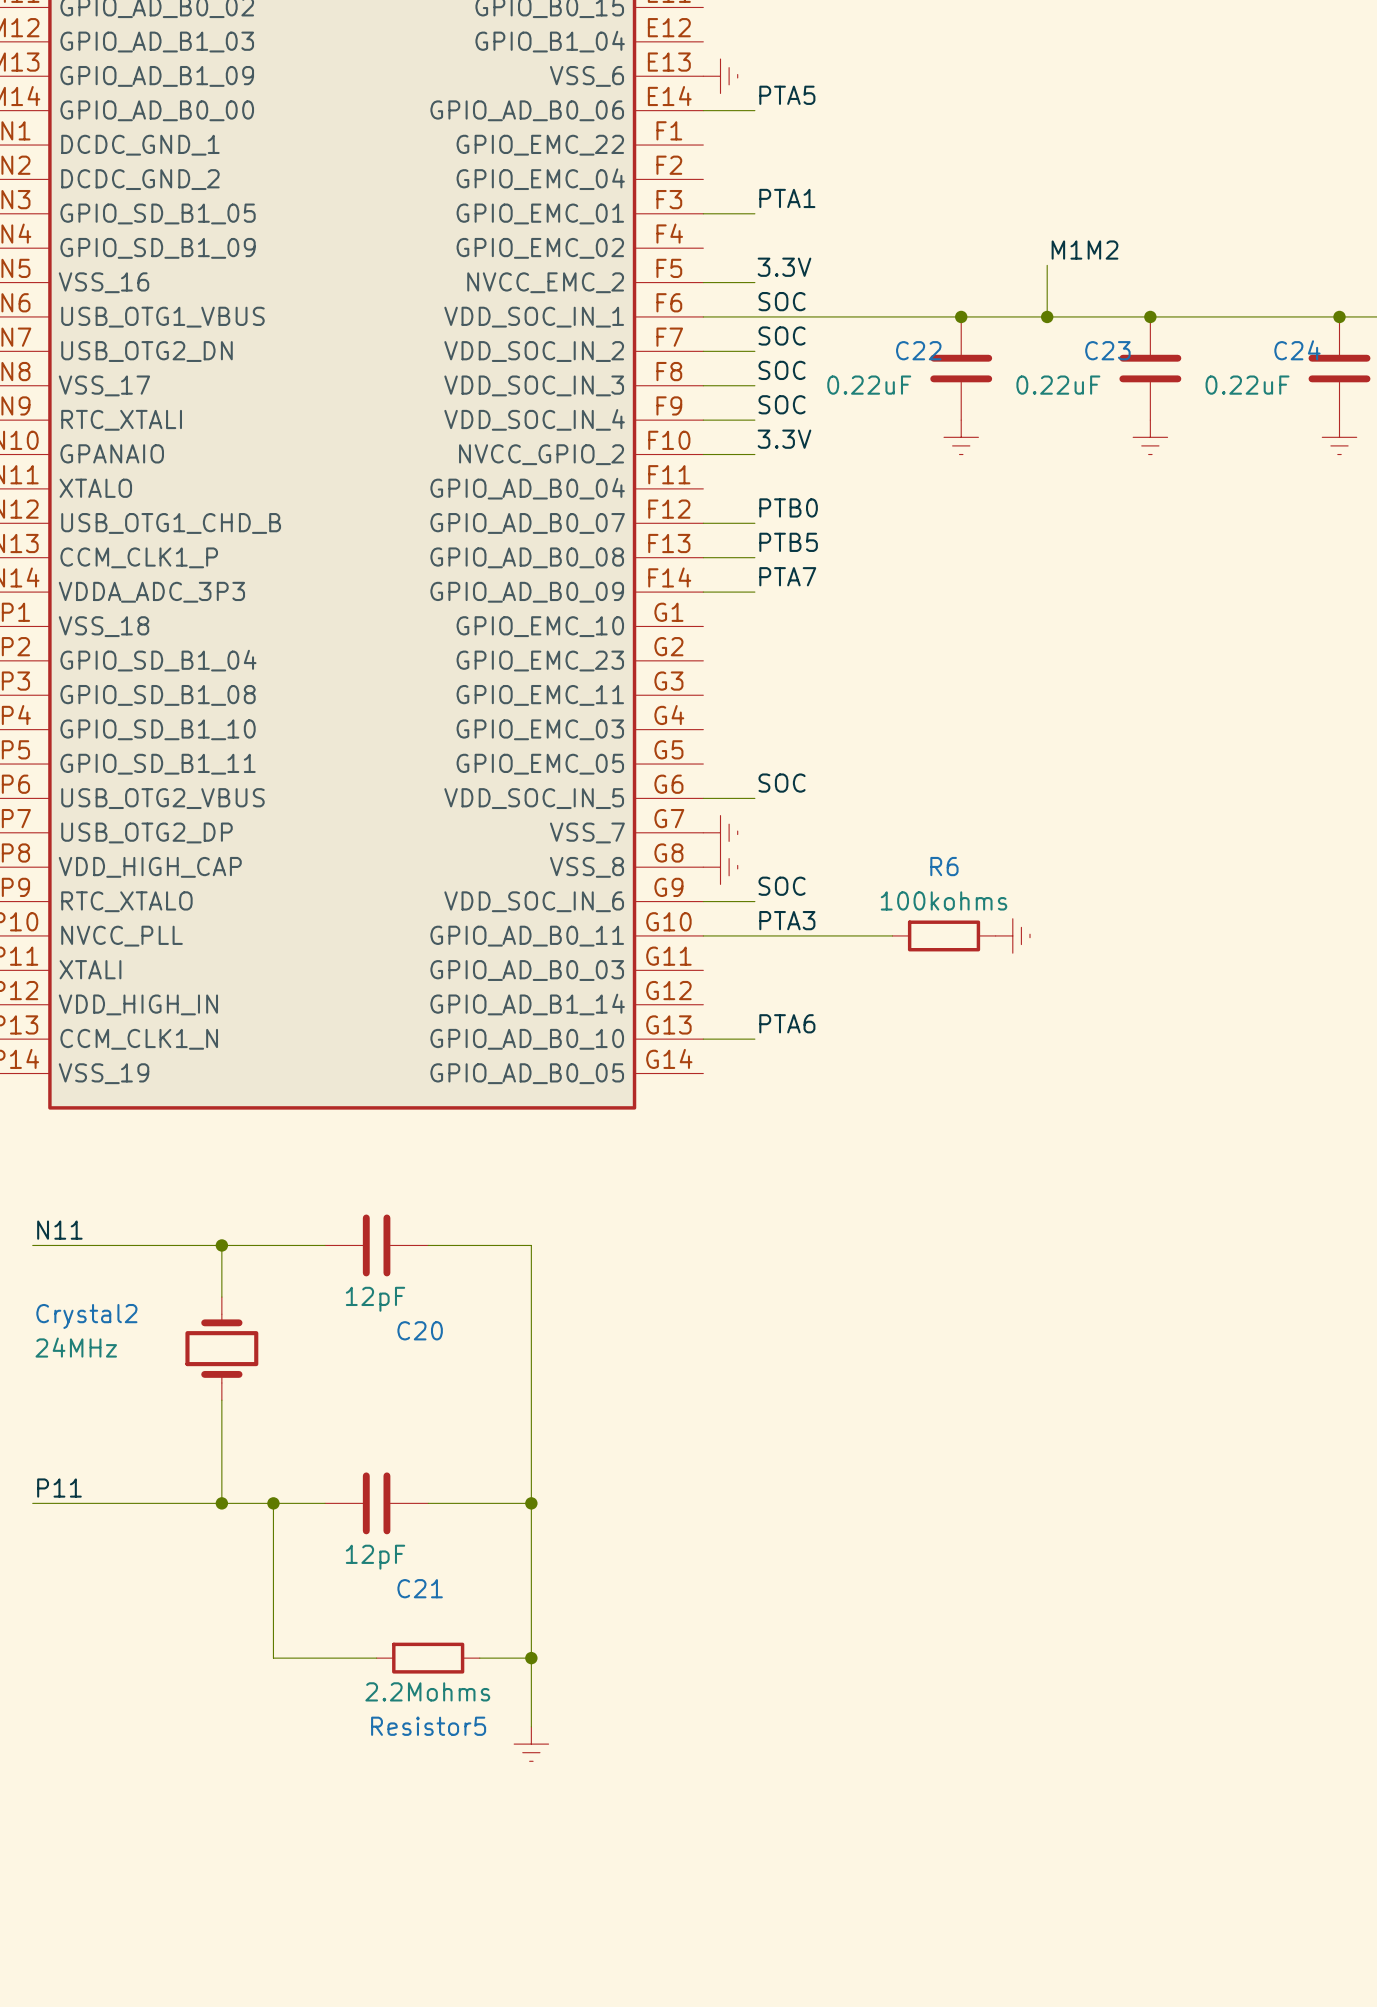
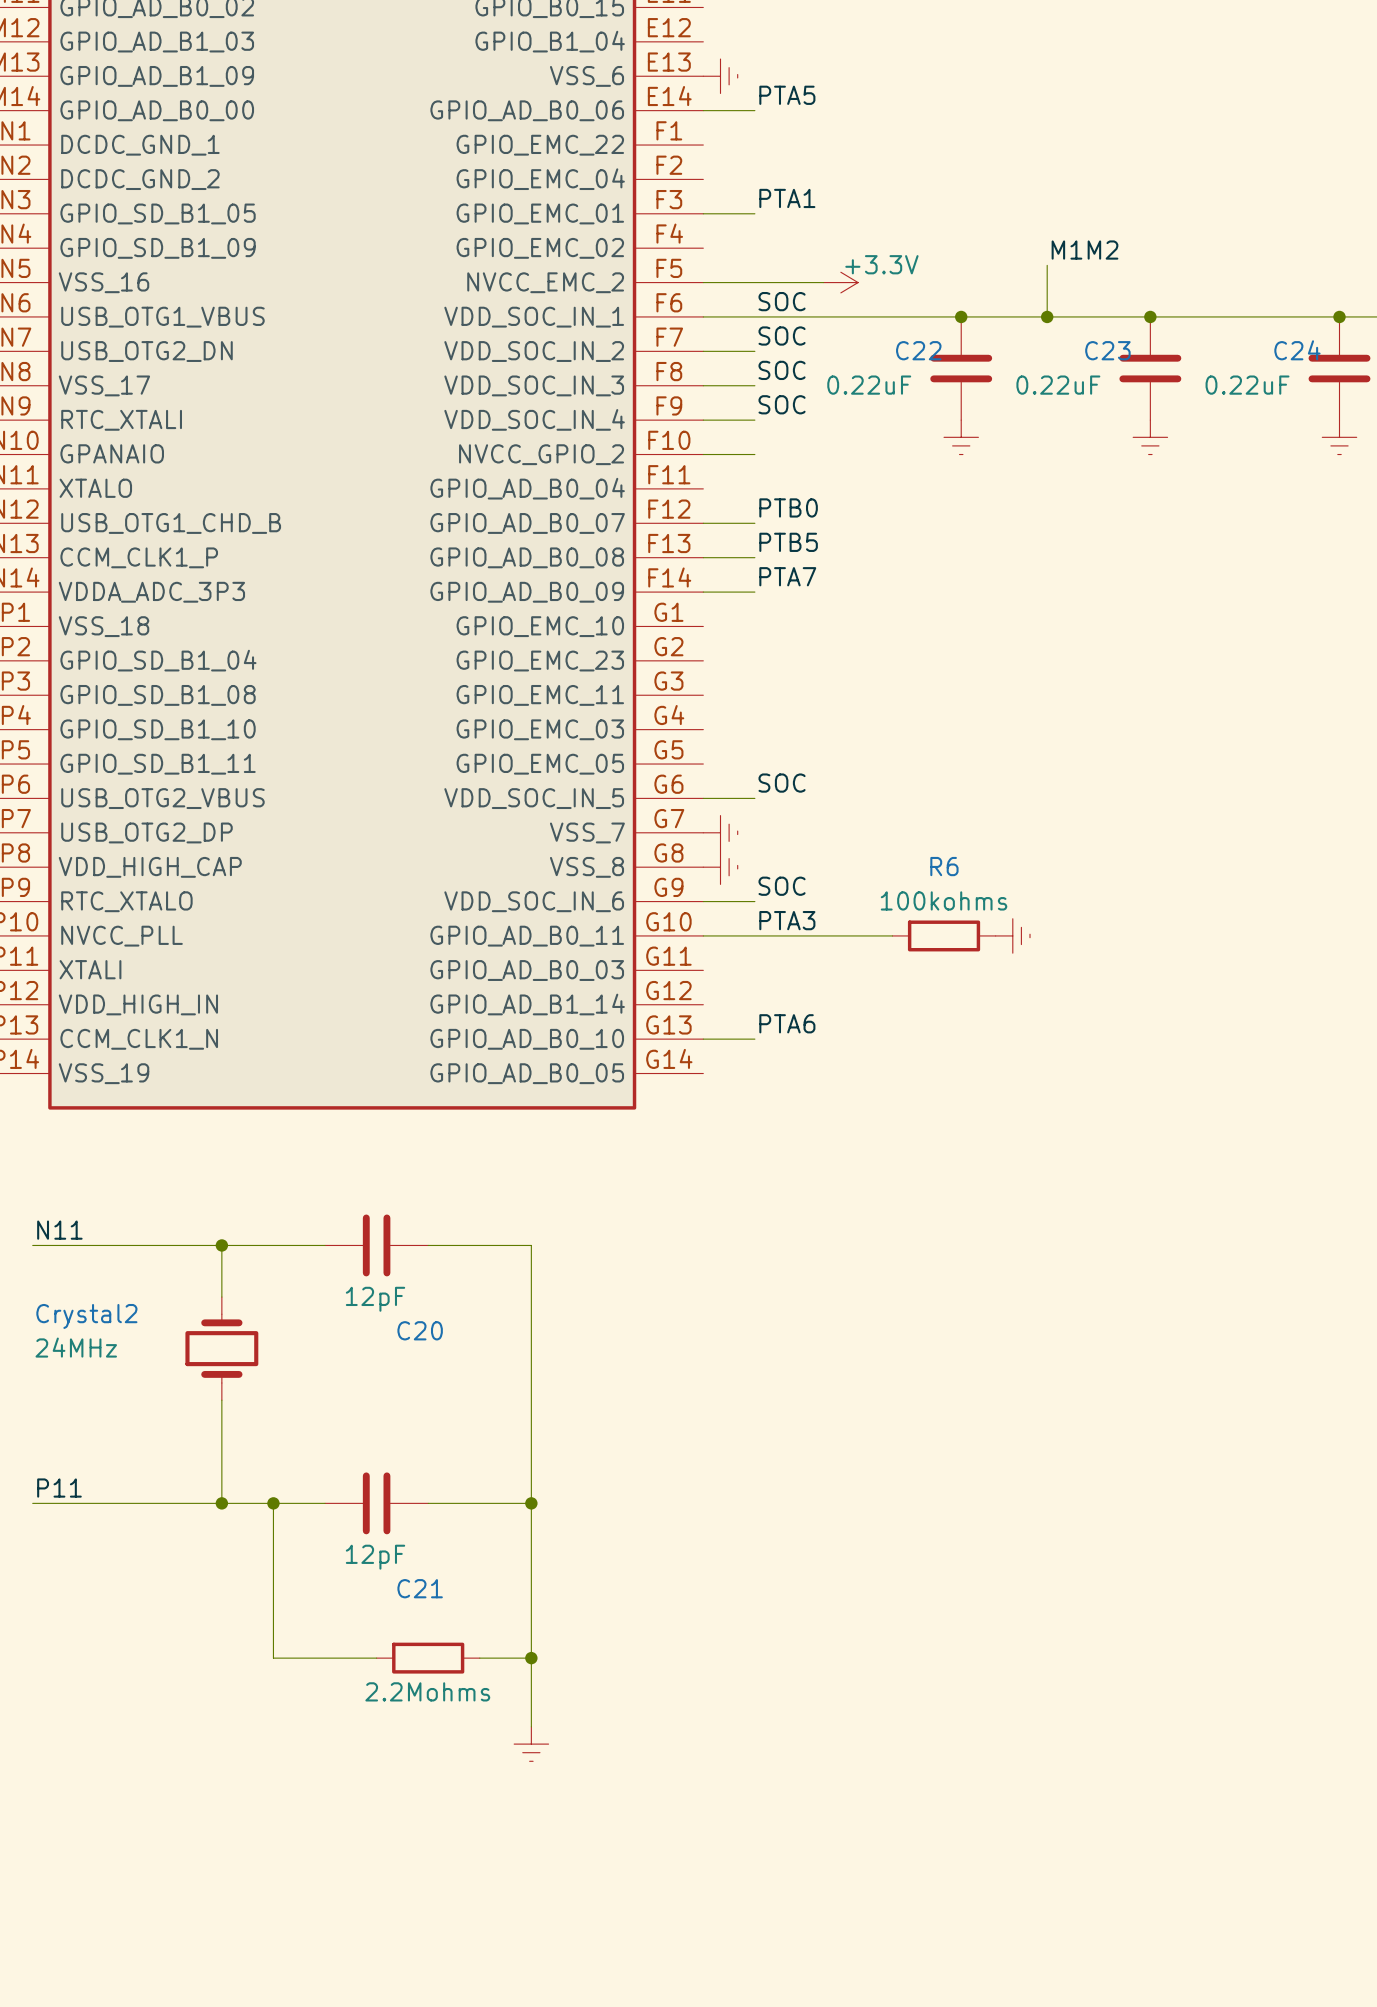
label: 3.3V (784, 267) -> none
wire: none -> (754, 282) (823, 282)
power symbol: none -> +3.3V (840, 282)
label: 3.3V (784, 439) -> none
Resistor5 name: Resistor5 (428, 1726) -> none

